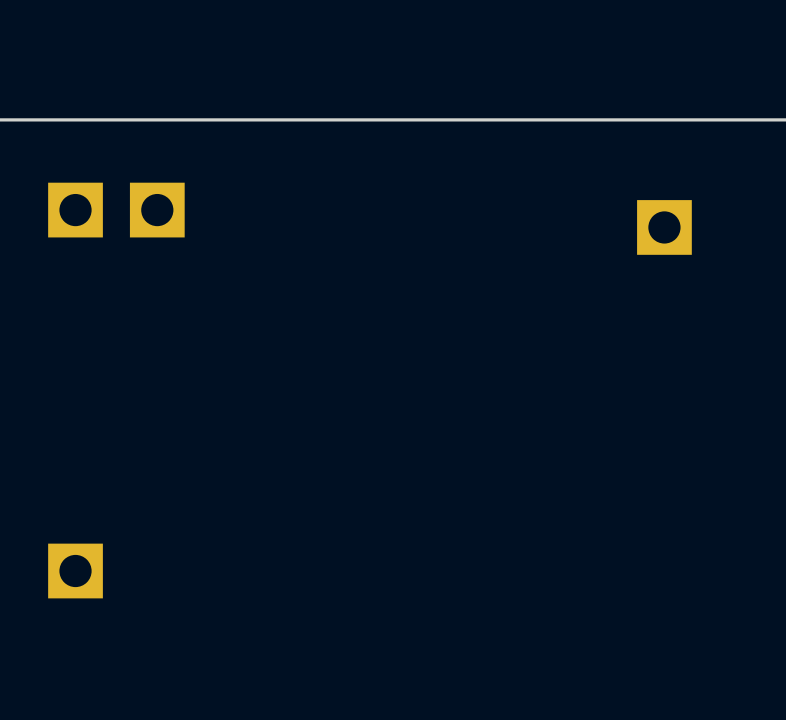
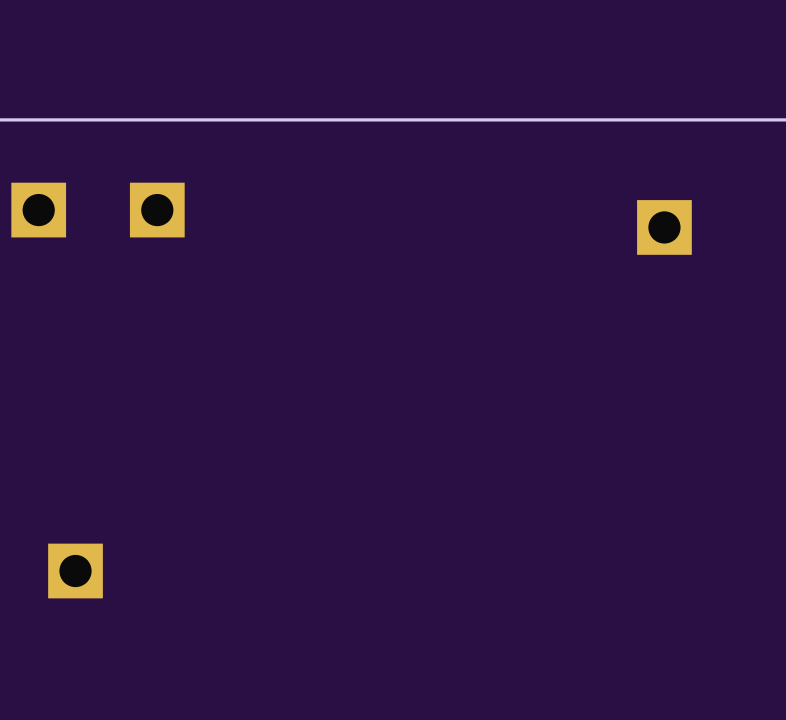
part position: (75, 210) -> (38, 210)

